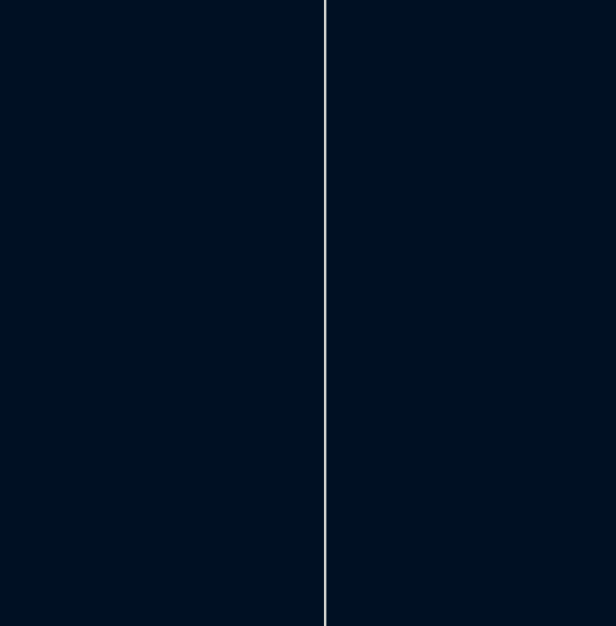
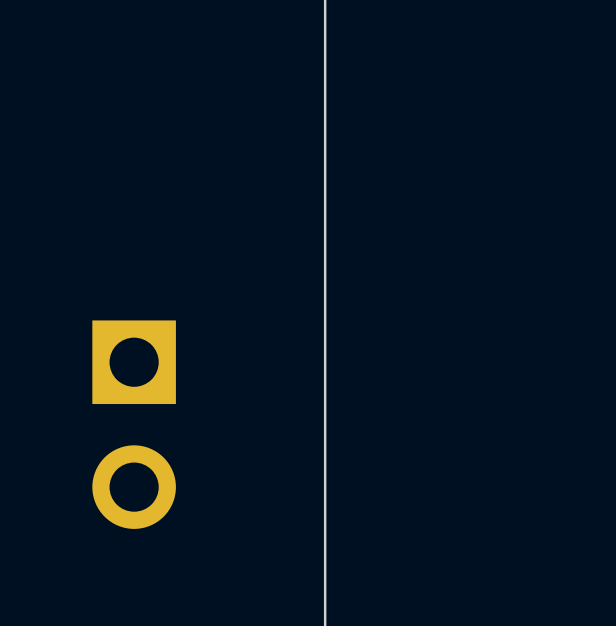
part: none -> (134, 424)

